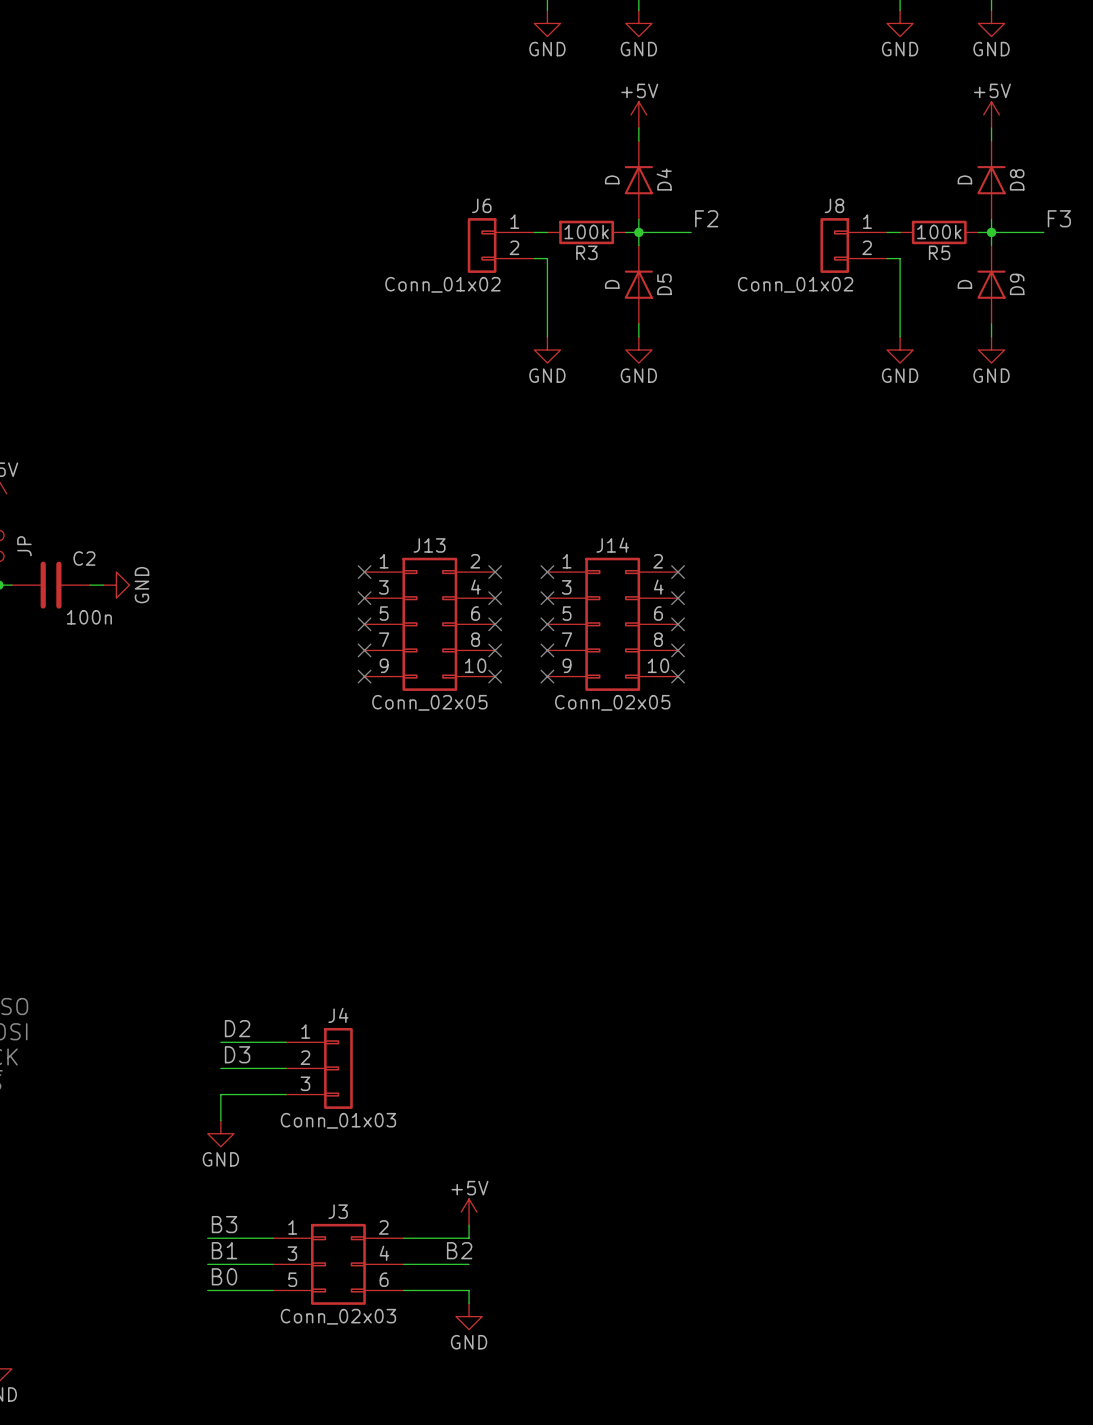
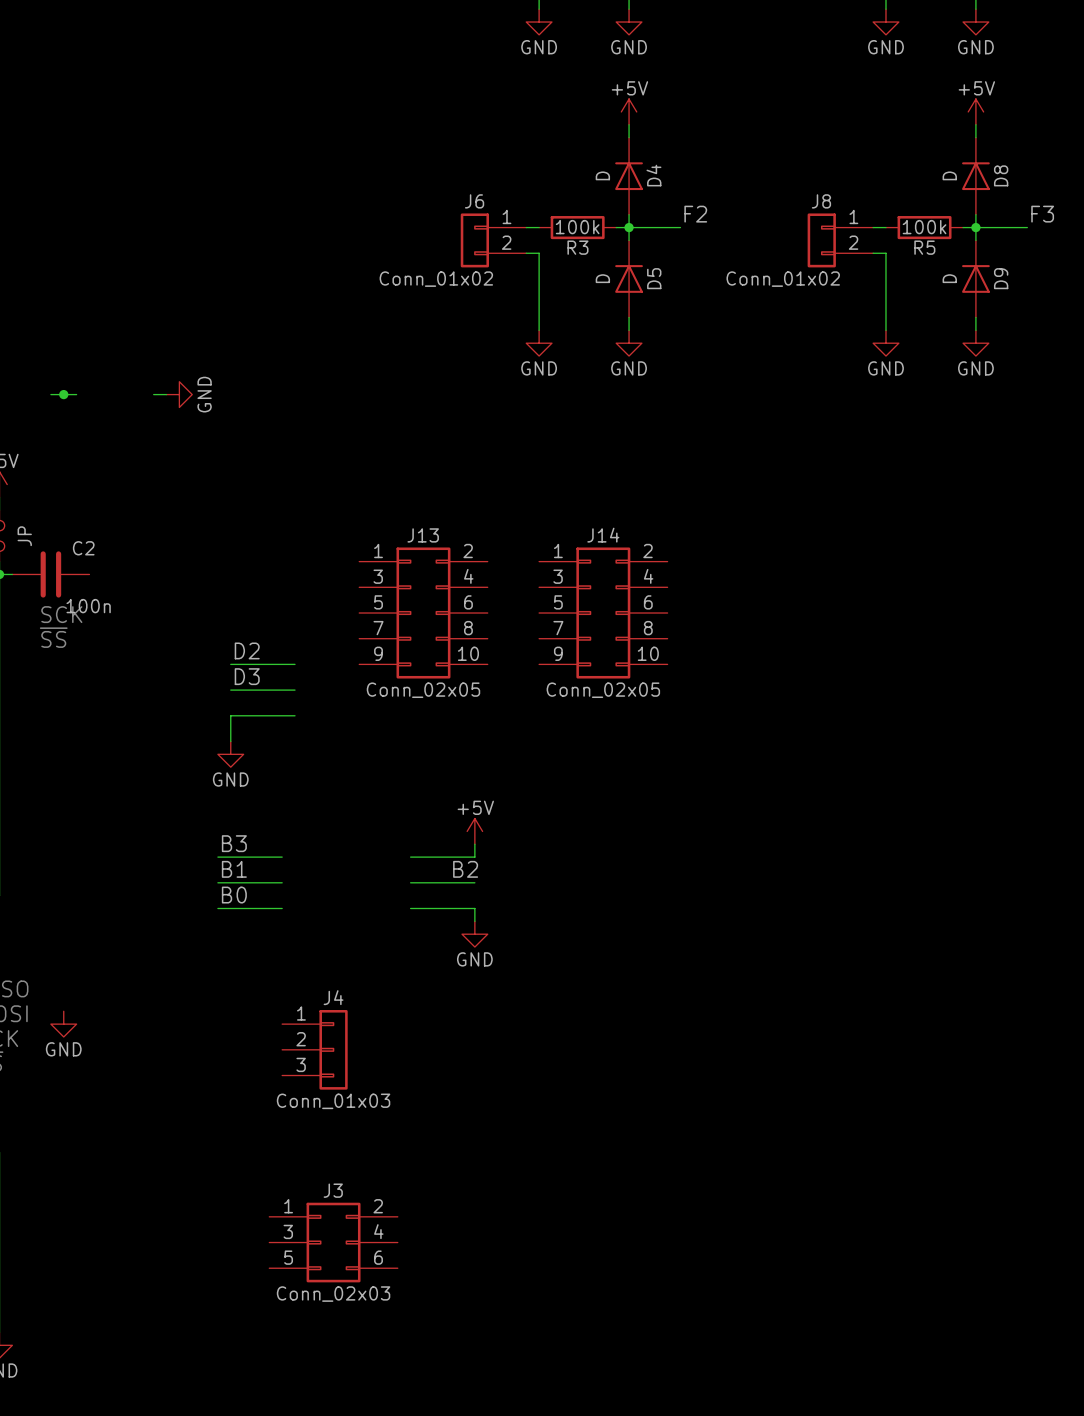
wire: none -> (50, 394) (76, 394)
junction: none -> (63, 394)
power symbol: none -> GND (179, 394)
no-connect mark: (364, 572) -> none
no-connect mark: (495, 572) -> none
no-connect mark: (547, 572) -> none
no-connect mark: (678, 572) -> none
wire: (90, 585) (103, 585) -> (153, 394) (166, 394)
power symbol: GND (116, 585) -> none
no-connect mark: (364, 598) -> none
no-connect mark: (495, 598) -> none
no-connect mark: (547, 598) -> none
no-connect mark: (678, 598) -> none
no-connect mark: (364, 624) -> none
no-connect mark: (495, 624) -> none
no-connect mark: (547, 624) -> none
no-connect mark: (678, 624) -> none
text: none -> SCK (61, 614)
text: none -> ~{SS} (53, 637)
no-connect mark: (364, 650) -> none
no-connect mark: (495, 650) -> none
no-connect mark: (547, 650) -> none
no-connect mark: (678, 650) -> none
label: none -> D2 (247, 650)
wire: none -> (230, 664) (295, 664)
no-connect mark: (364, 676) -> none
no-connect mark: (495, 676) -> none
no-connect mark: (547, 676) -> none
no-connect mark: (678, 676) -> none
label: none -> D3 (247, 676)
wire: none -> (230, 690) (295, 690)
wire: none -> (295, 715) (230, 715) (230, 741)
power symbol: none -> GND (230, 754)
power symbol: none -> +5V (474, 831)
label: none -> B3 (234, 843)
wire: none -> (474, 844) (474, 857) (410, 857)
wire: none -> (217, 857) (282, 857)
label: none -> B1 (234, 869)
label: none -> B2 (465, 869)
wire: none -> (410, 882) (474, 882)
label: none -> B0 (234, 895)
wire: none -> (410, 908) (474, 908) (474, 921)
power symbol: none -> GND (474, 934)
label: D2 (237, 1028) -> none
power symbol: none -> GND (63, 1024)
wire: (220, 1042) (286, 1042) -> (217, 882) (282, 882)
label: D3 (237, 1054) -> none
wire: (220, 1068) (286, 1068) -> (217, 908) (282, 908)
wire: (286, 1094) (220, 1094) (220, 1120) -> none
power symbol: GND (220, 1133) -> none
power symbol: +5V (469, 1212) -> none
label: B3 (224, 1224) -> none
wire: (469, 1225) (469, 1238) (403, 1238) -> none
wire: (207, 1238) (273, 1238) -> none
label: B1 (224, 1250) -> none
label: B2 (459, 1250) -> none
wire: (207, 1264) (273, 1264) -> none
wire: (403, 1264) (469, 1264) -> none
label: B0 (224, 1276) -> none
wire: (207, 1290) (273, 1290) -> none
wire: (403, 1290) (469, 1290) (469, 1303) -> none
power symbol: GND (469, 1316) -> none

